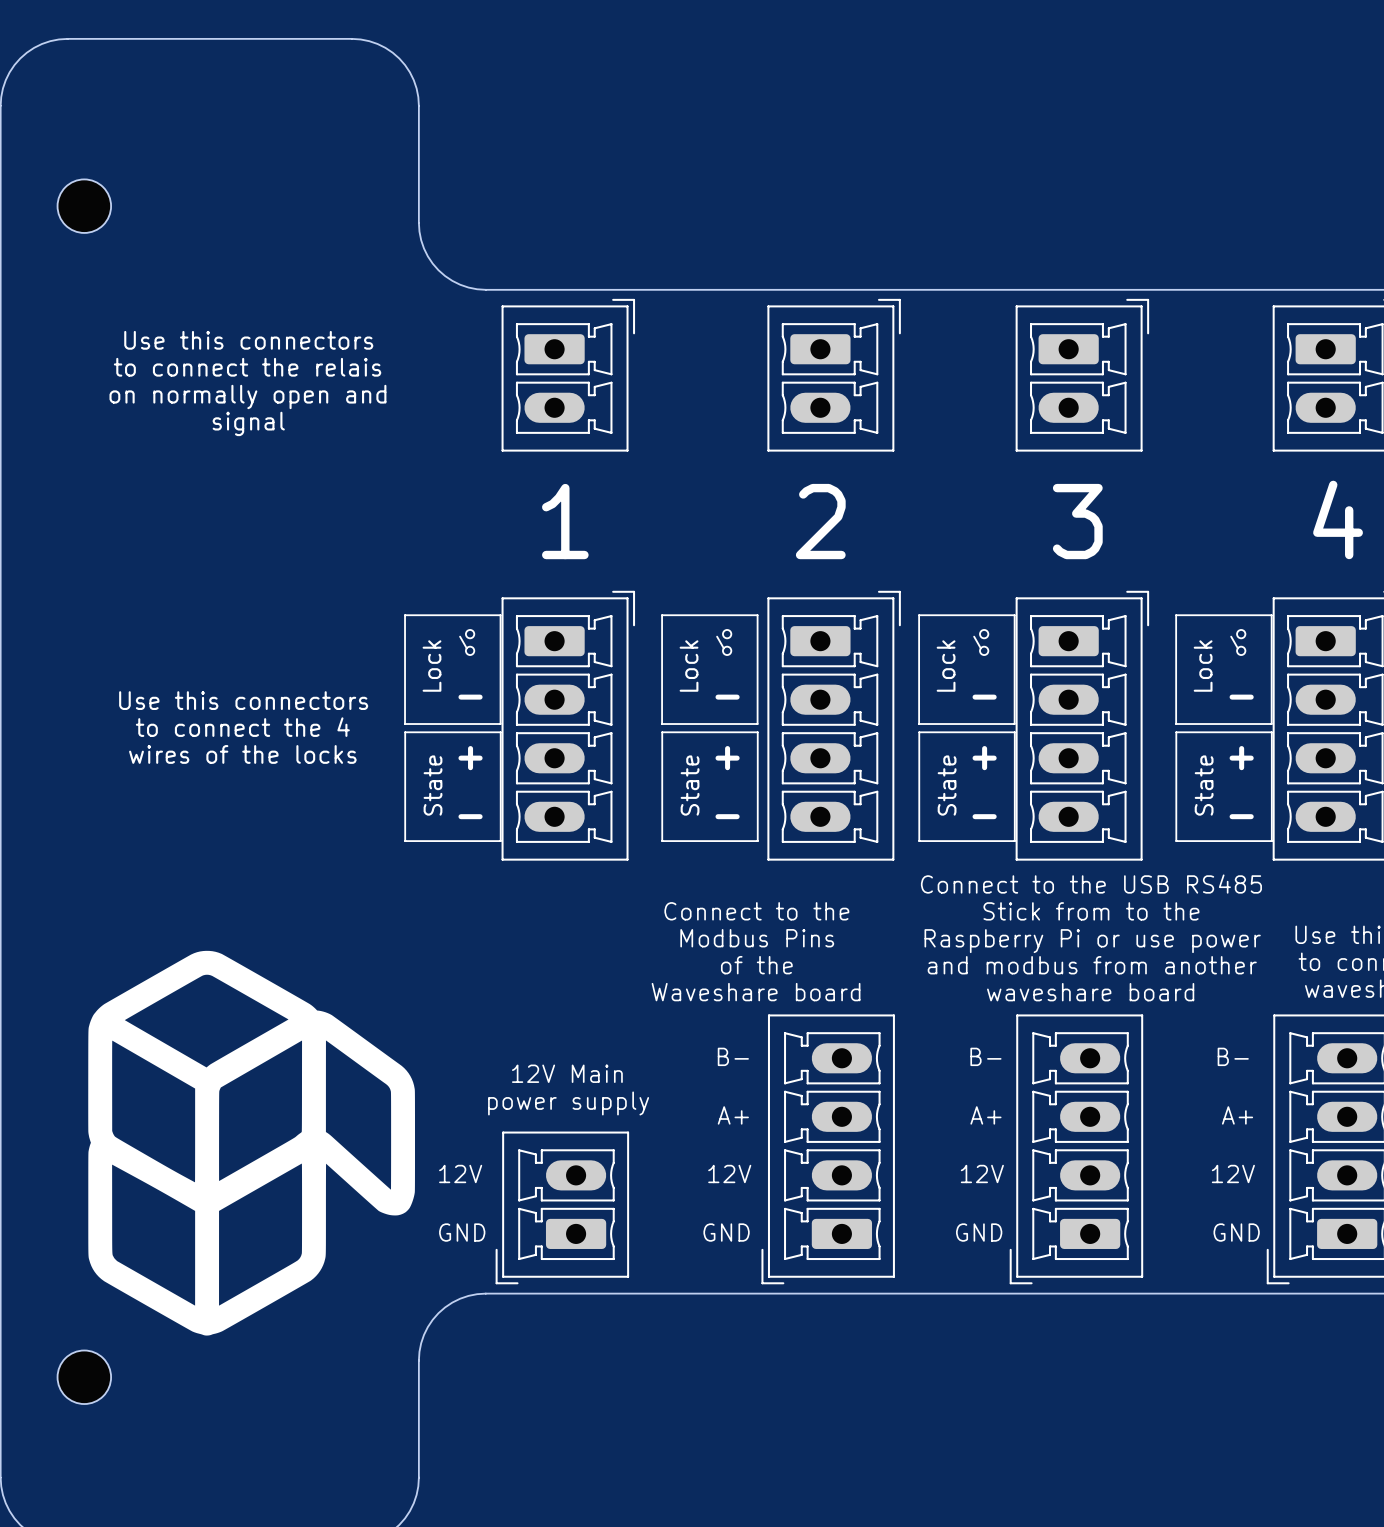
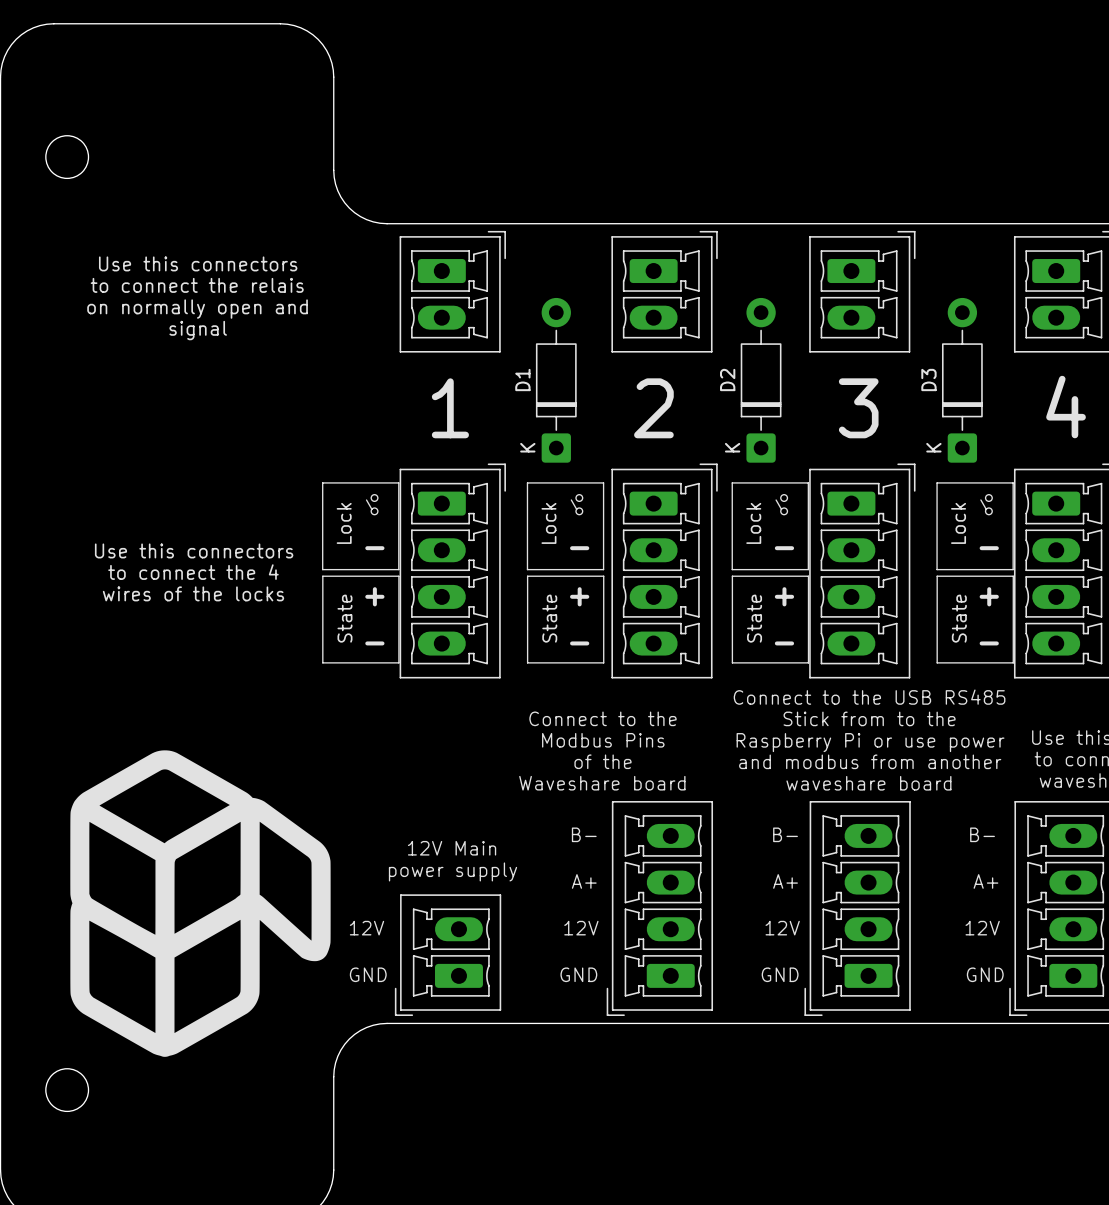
D1: none -> (556, 380)
D2: none -> (761, 380)
D3: none -> (962, 380)

